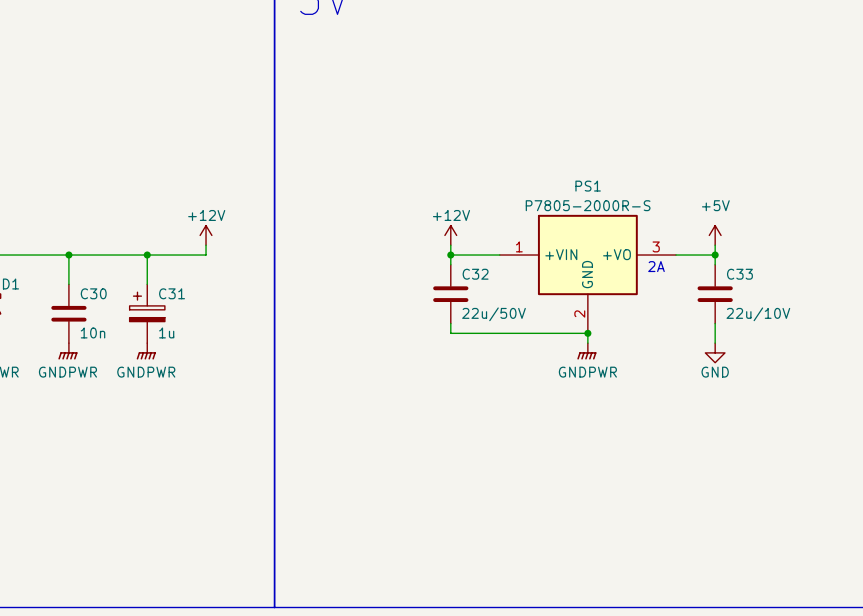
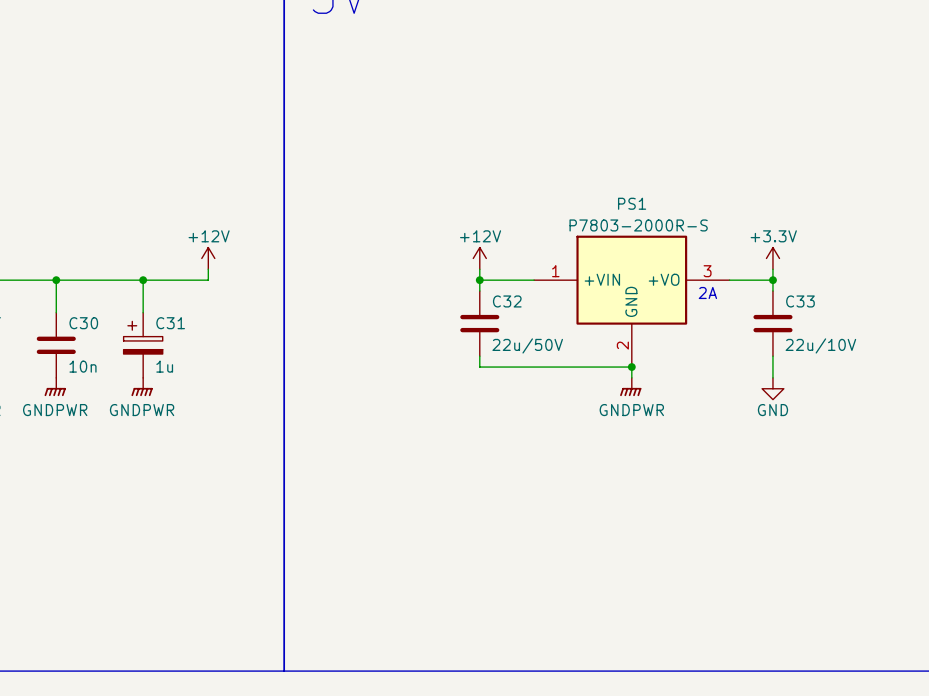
PS1 value: P7805-2000R-S (588, 205) -> P7803-2000R-S (638, 225)
power symbol: +5V (715, 235) -> +3.3V (772, 258)

